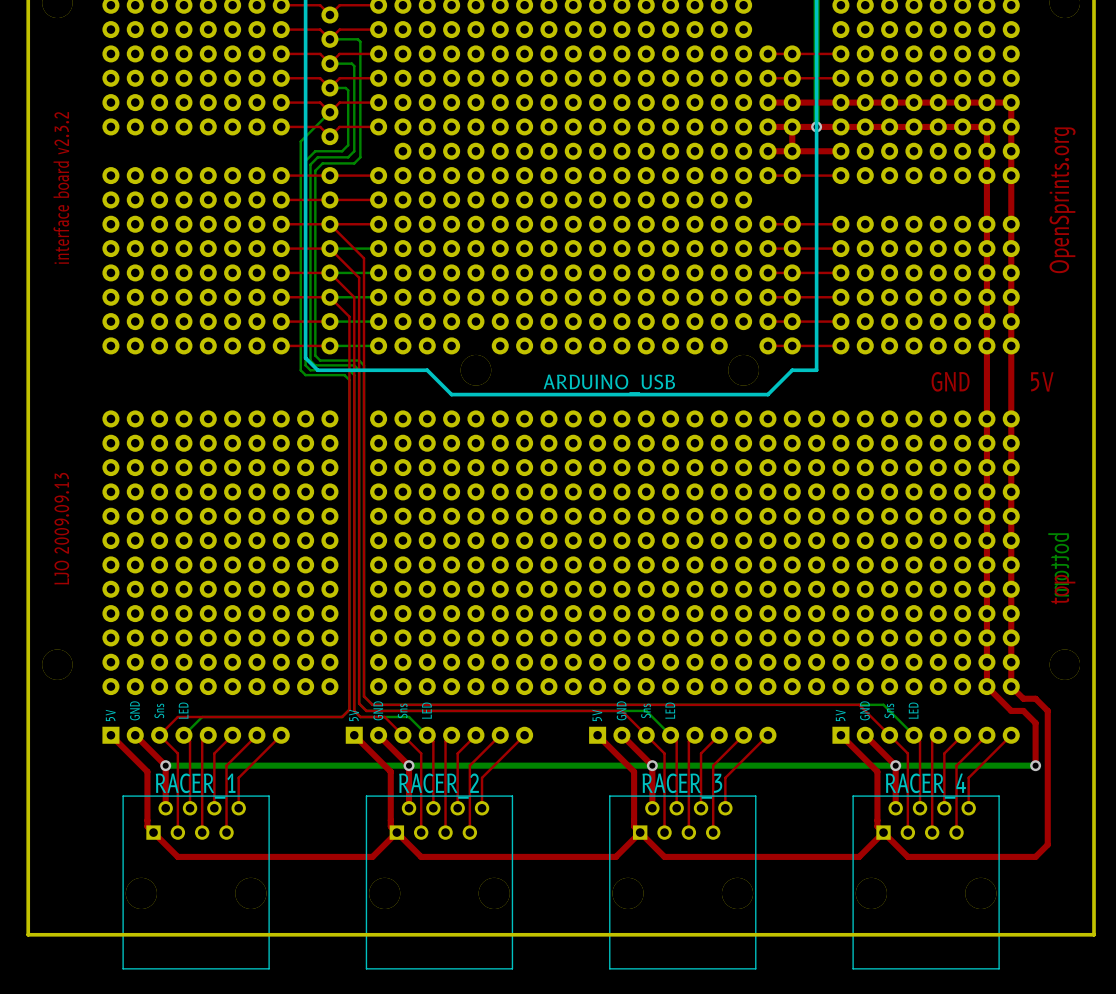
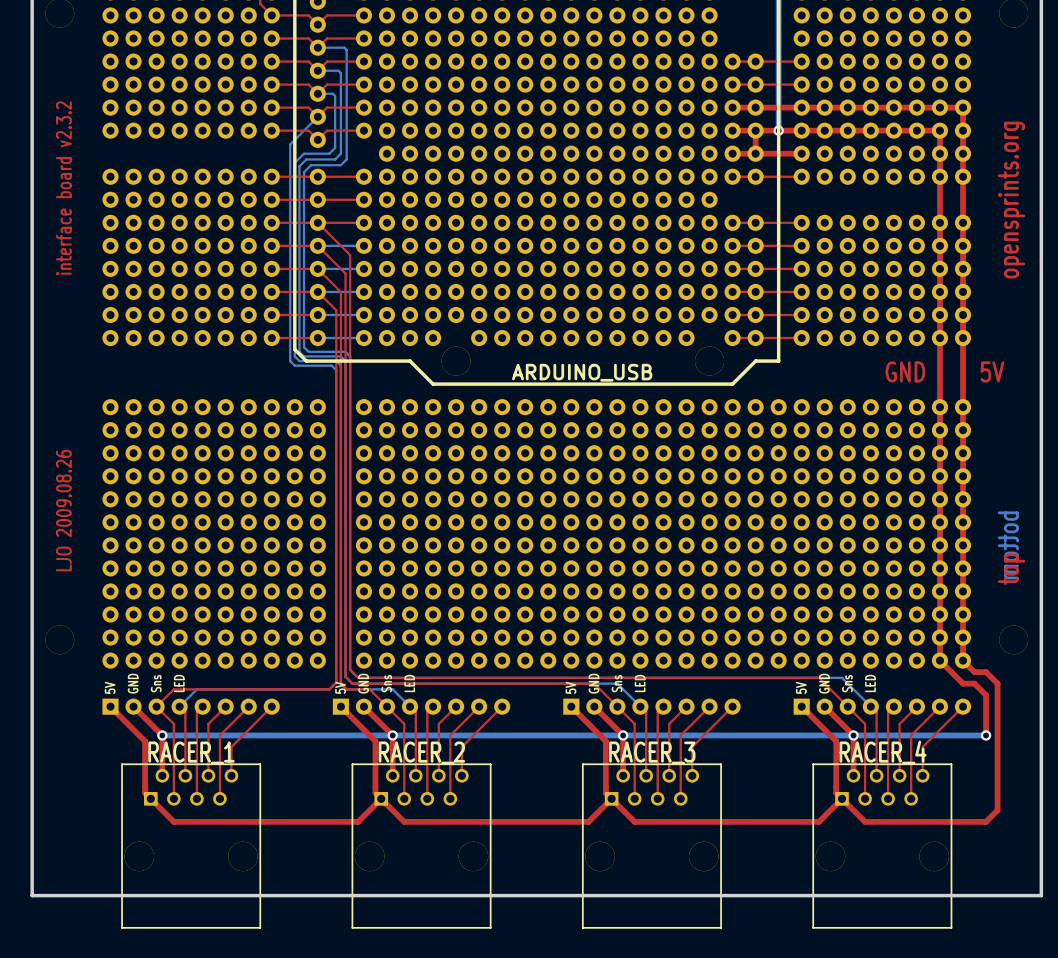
text: OpenSprints.org (1062, 200) -> opensprints.org (1011, 200)
text: LJO 2009.09.13 (61, 528) -> LJO 2009.08.26 (63, 510)

